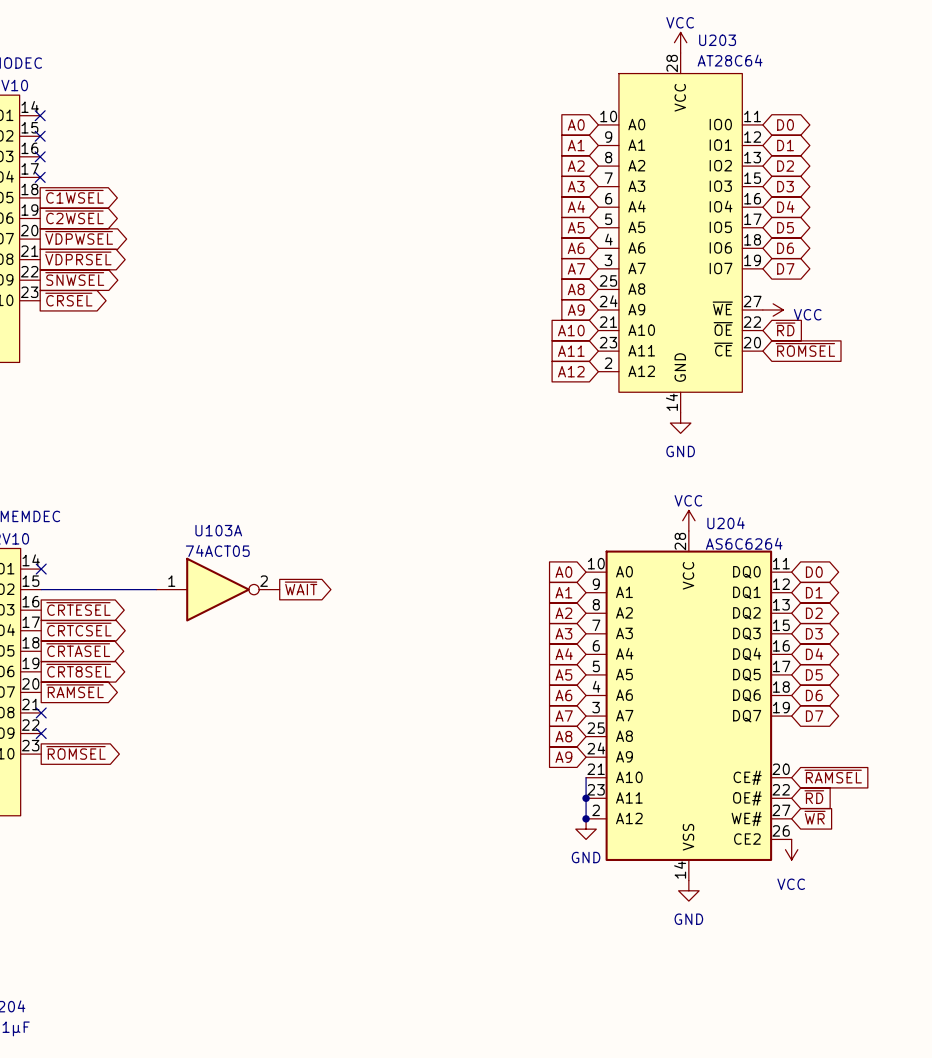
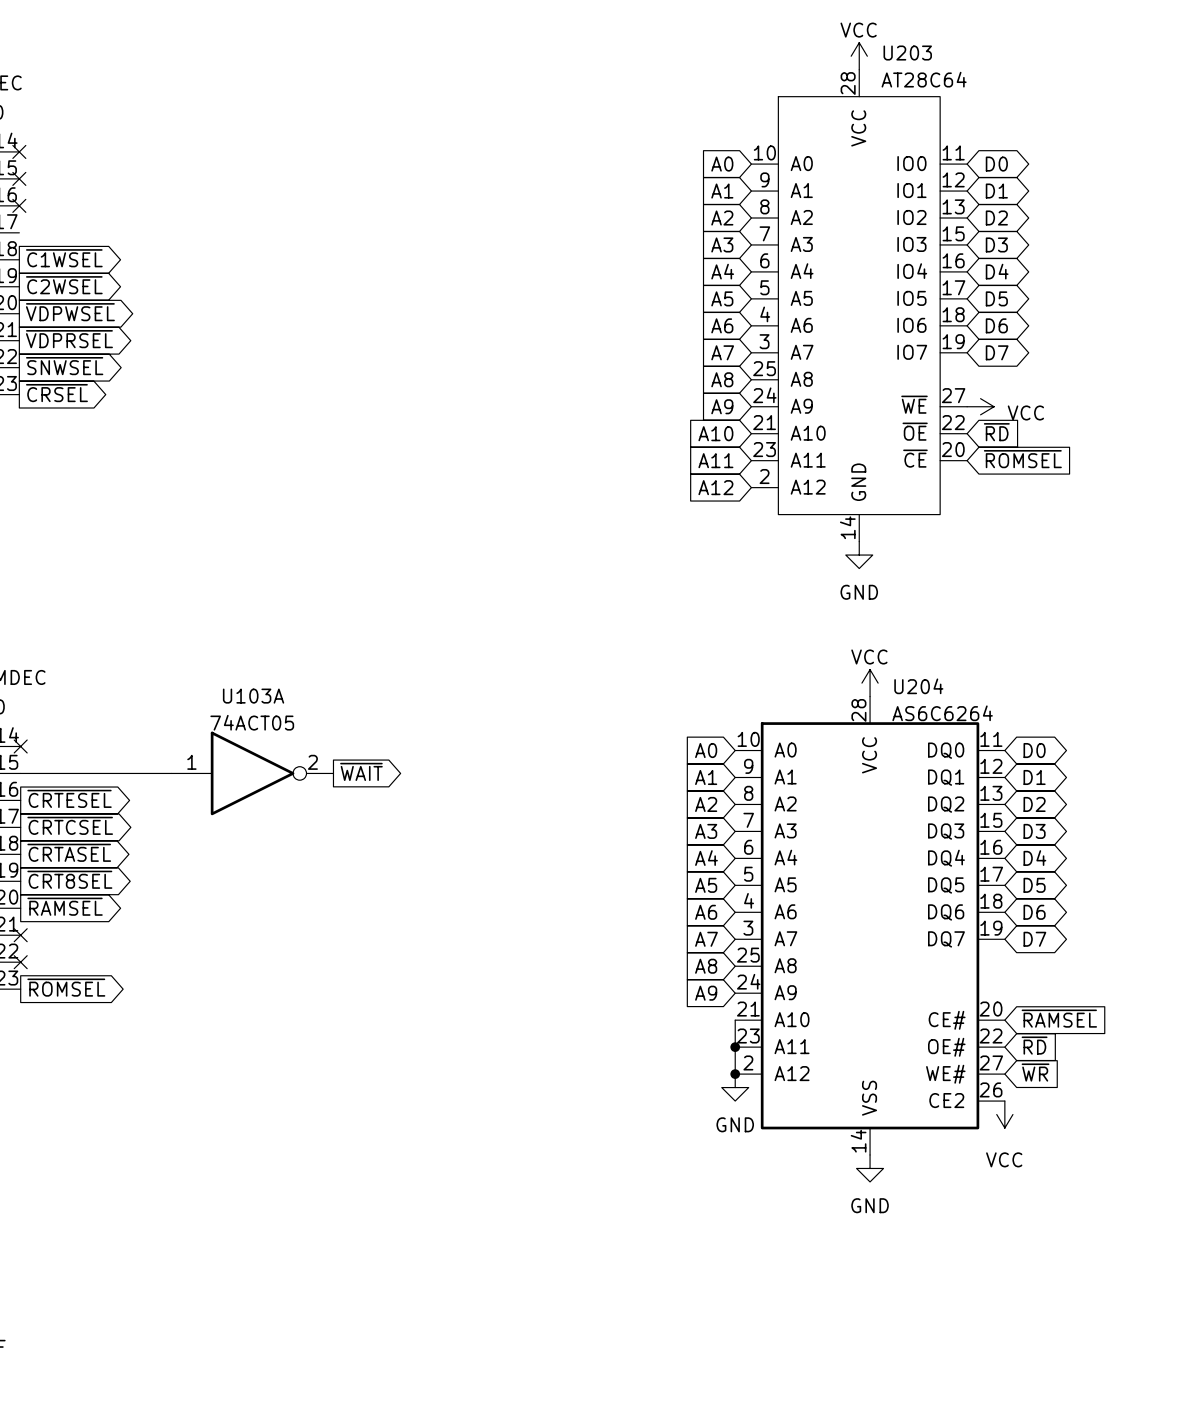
no-connect mark: (40, 177) -> none

